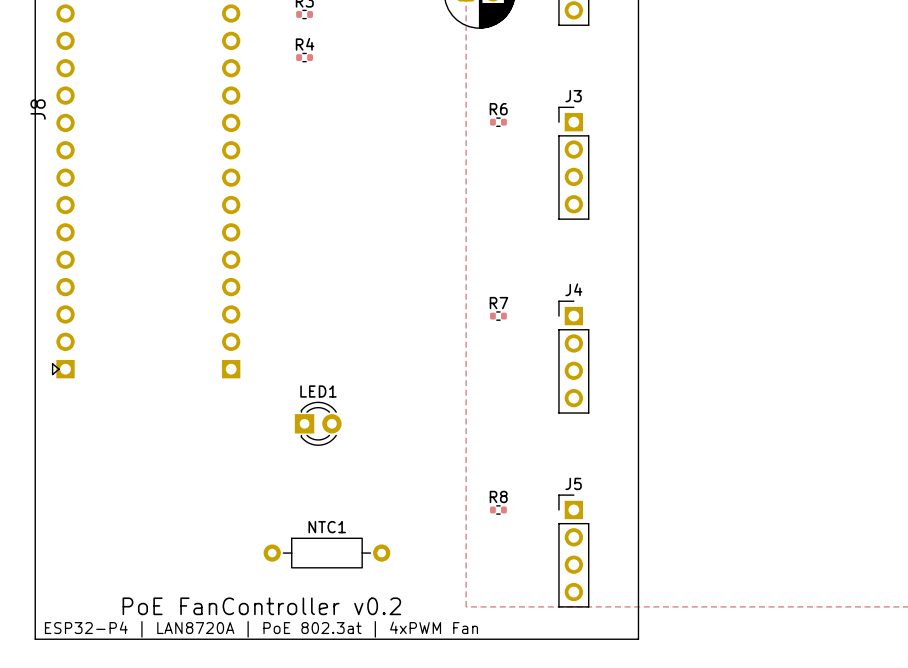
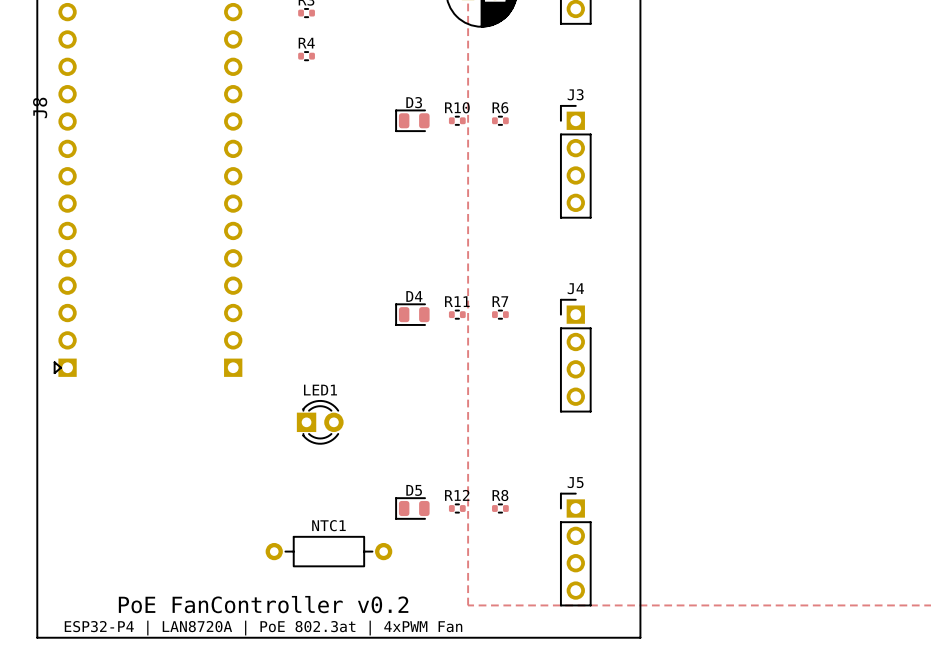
D3: none -> (412, 120)
R10: none -> (457, 120)
D4: none -> (412, 314)
R11: none -> (457, 314)
D5: none -> (412, 508)
R12: none -> (457, 508)

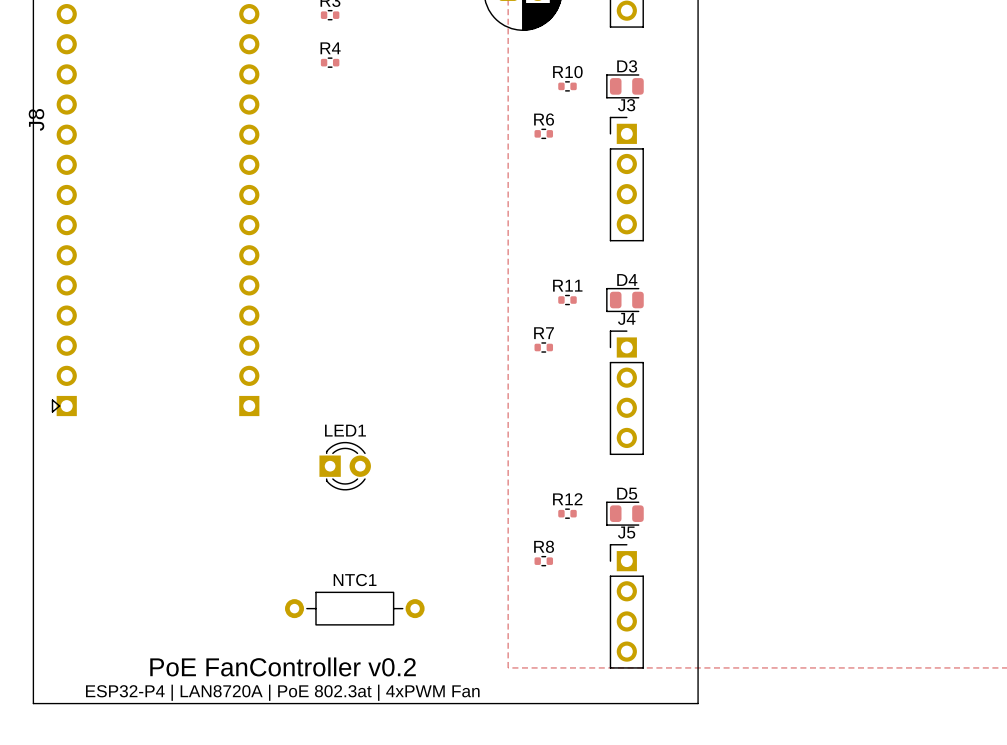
D3 position: (412, 120) -> (624, 86)
R10 position: (457, 120) -> (567, 86)
D4 position: (412, 314) -> (624, 300)
R11 position: (457, 314) -> (567, 300)
D5 position: (412, 508) -> (624, 513)
R12 position: (457, 508) -> (567, 513)

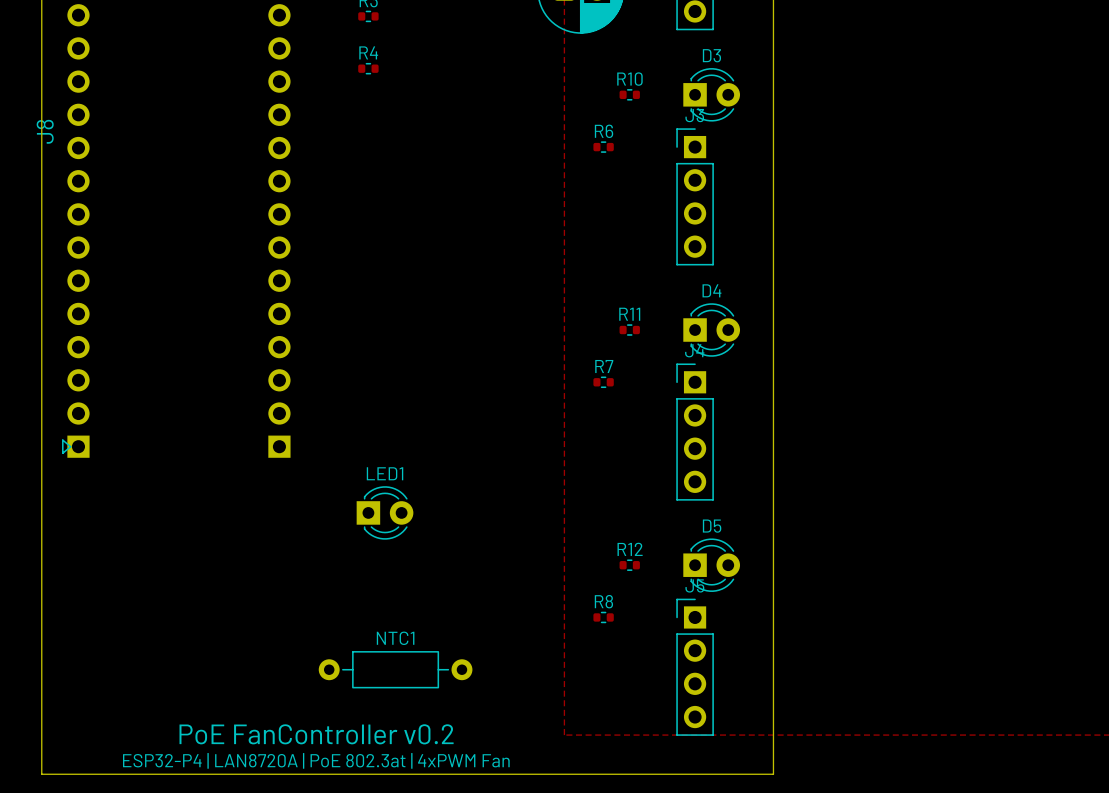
D3 footprint: [606, 74, 644, 99] -> [683, 68, 741, 122]
D4 footprint: [606, 287, 644, 313] -> [683, 303, 741, 357]
D5 footprint: [606, 501, 644, 526] -> [683, 538, 741, 592]

